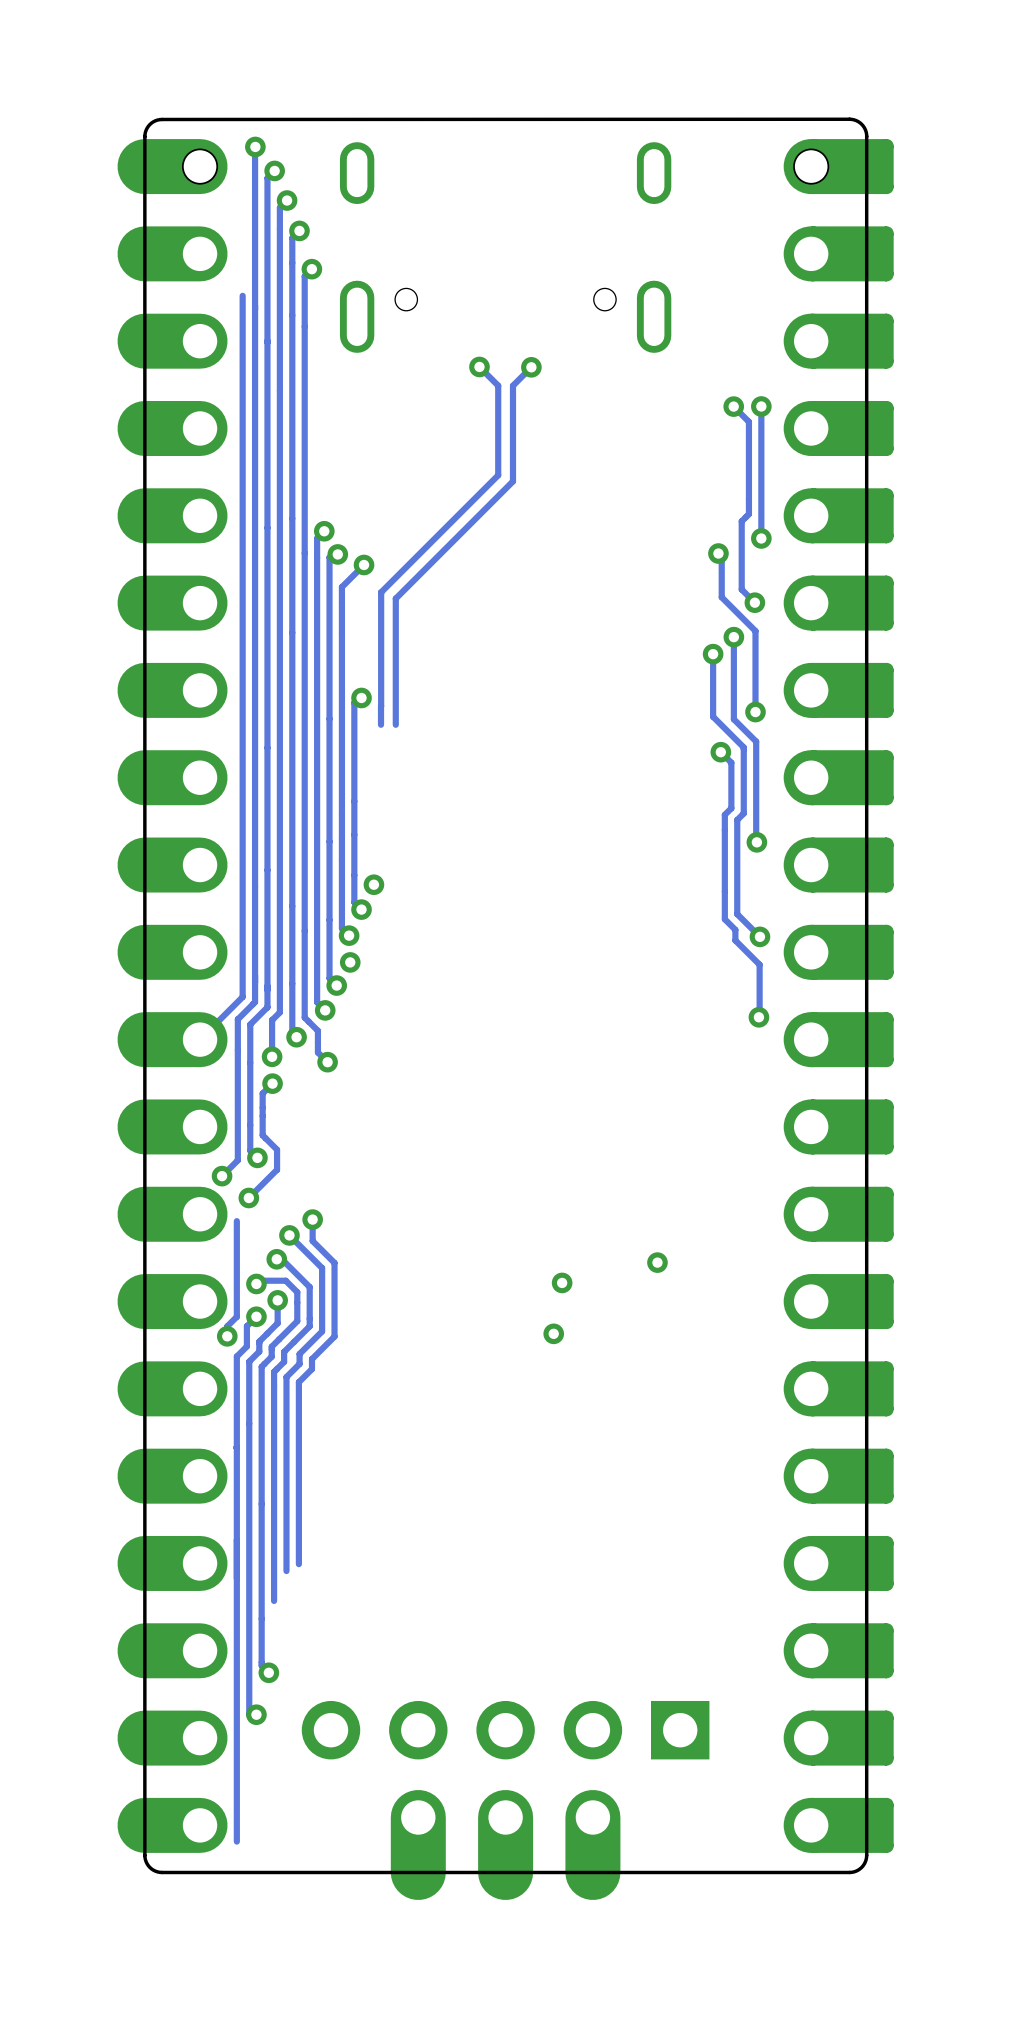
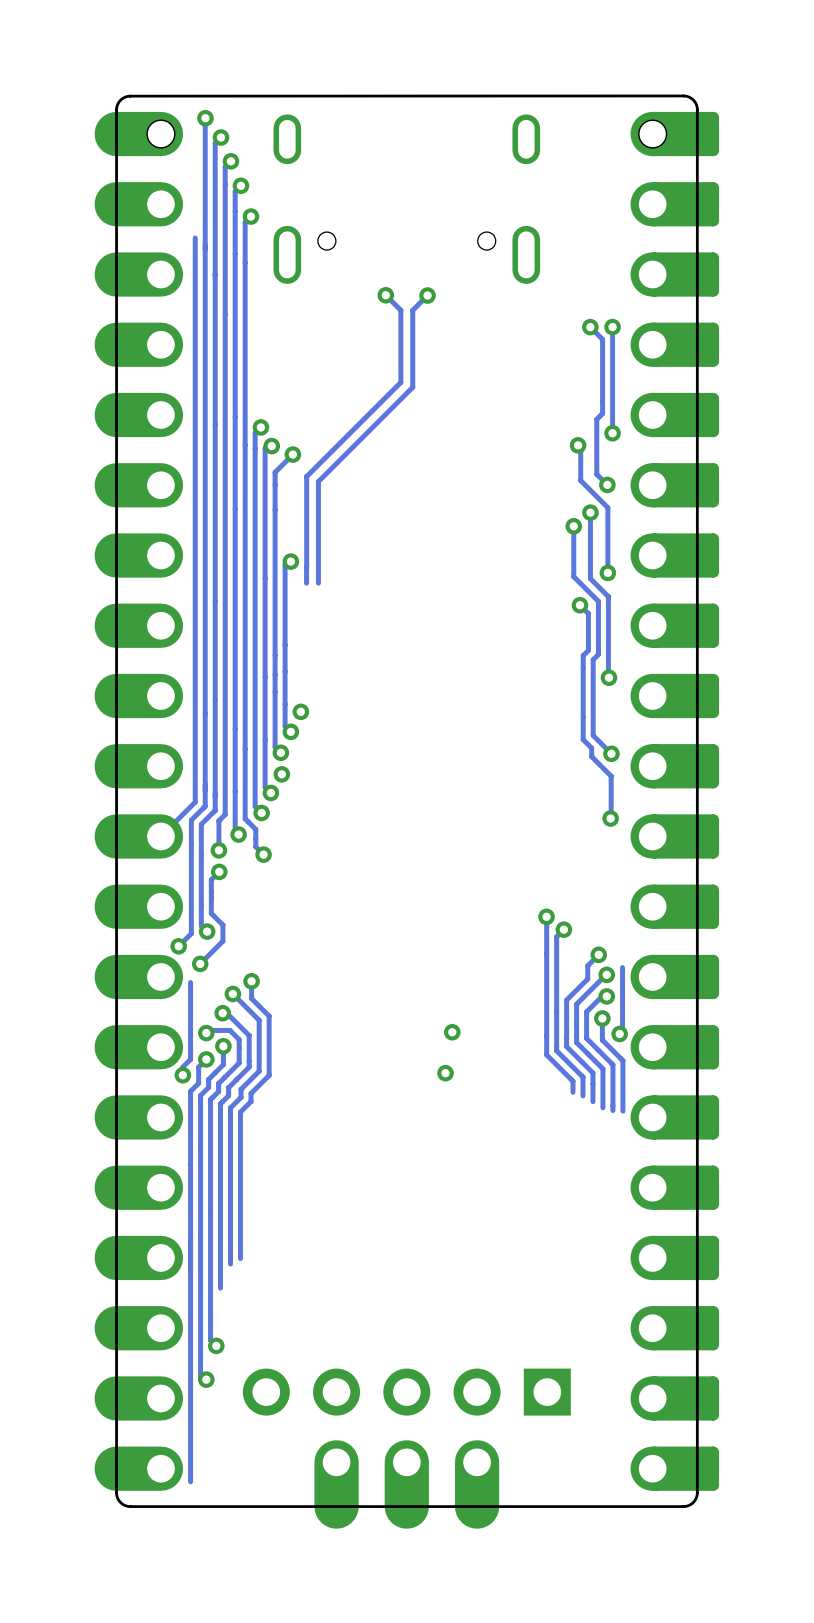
track: none -> (546, 916) (546, 1054) (572, 1081) (572, 1092)
via: none -> (546, 916)
track: none -> (563, 929) (556, 936) (556, 1050) (582, 1077) (582, 1095)
via: none -> (563, 929)
track: none -> (598, 954) (587, 965) (587, 978) (566, 1000) (566, 1046) (592, 1073) (592, 1101)
via: none -> (598, 954)
track: none -> (622, 967) (622, 1031) (619, 1034)
track: none -> (606, 974) (576, 1004) (576, 1042) (602, 1068) (602, 1107)
via: none -> (606, 974)
track: none -> (606, 996) (602, 996) (586, 1011) (586, 1038) (612, 1064) (612, 1110)
via: none -> (606, 996)
via: (657, 1262) -> none
track: none -> (602, 1018) (602, 1040) (622, 1060) (622, 1111)
via: none -> (602, 1018)
via: none -> (619, 1034)

